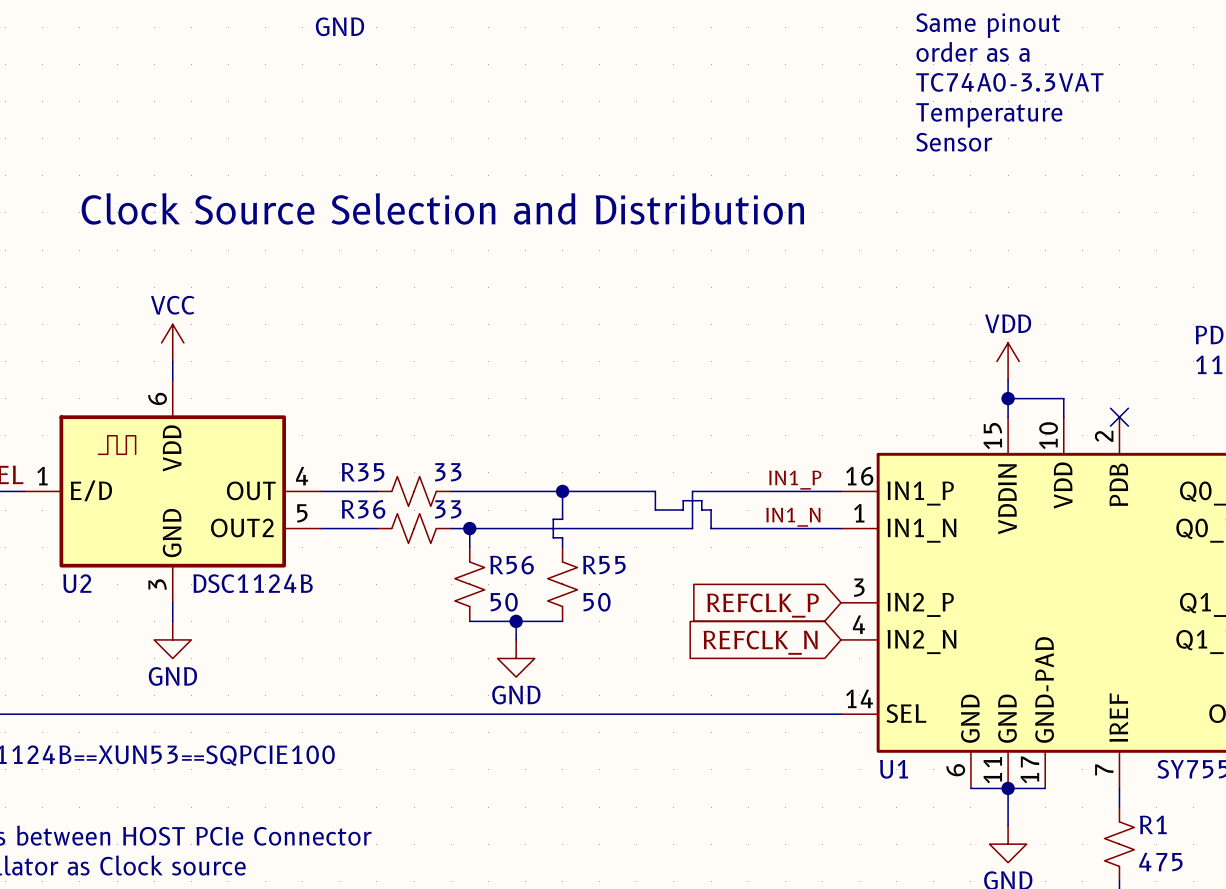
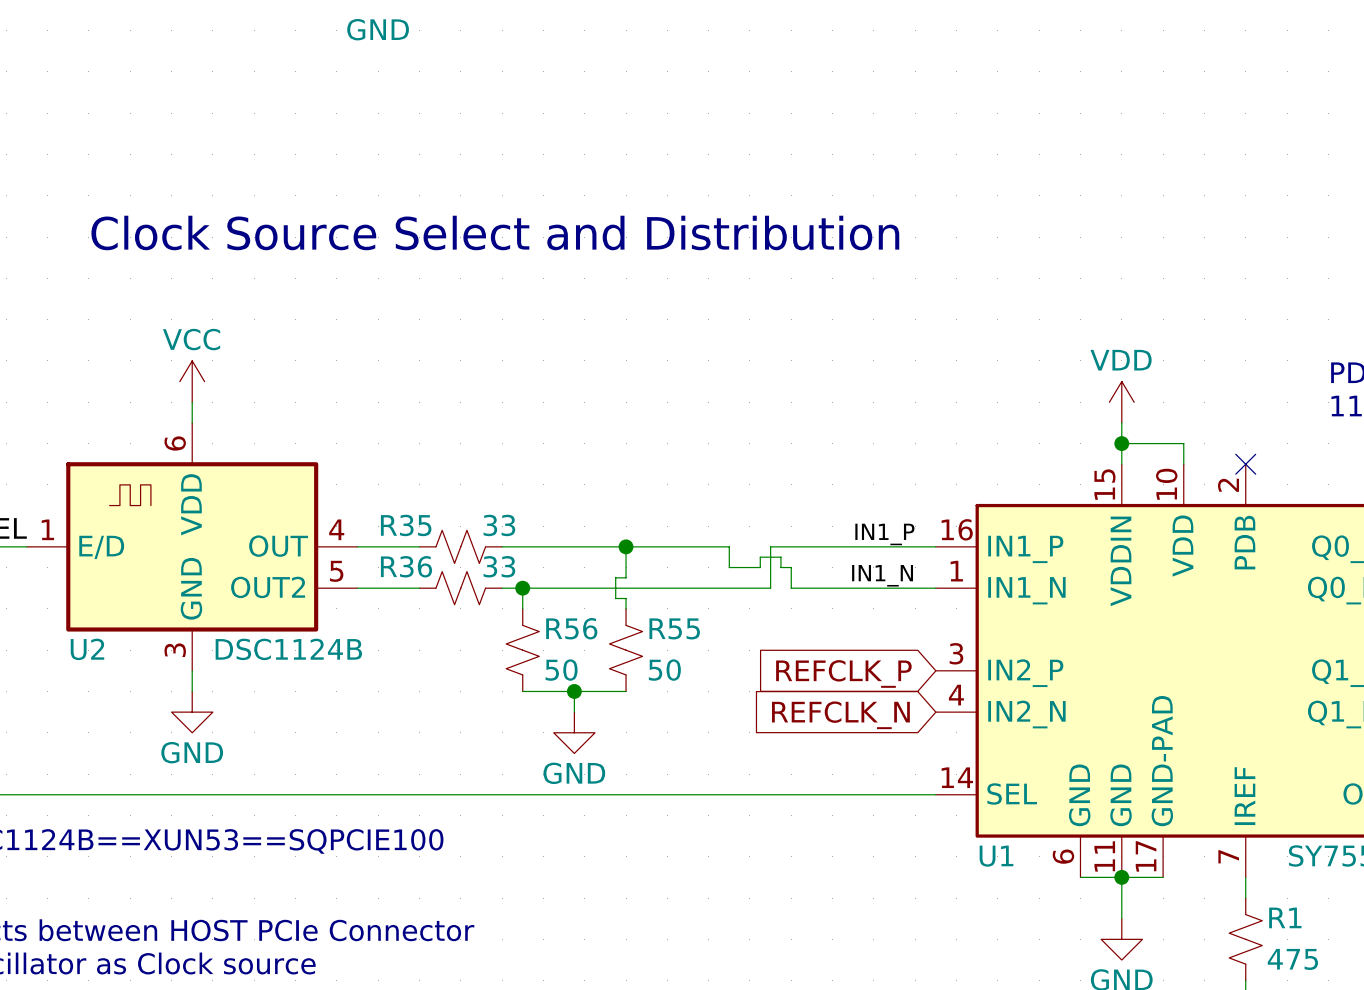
text: Same pinout (988, 25) -> none
text: order as a (973, 51) -> none
text: TC74A0-3.3VAT (1009, 82) -> none
text: Temperature (989, 115) -> none
text: Sensor (954, 142) -> none
text: Clock Source Selection and Distribution (442, 208) -> Clock Source Select and Distribution (495, 232)

